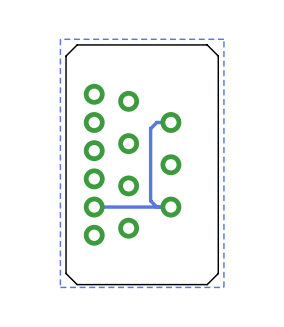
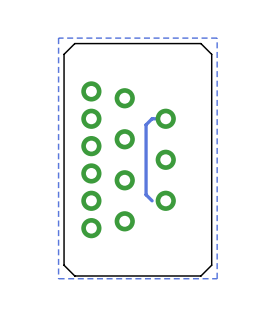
track: (170, 207) (94, 207) -> none

